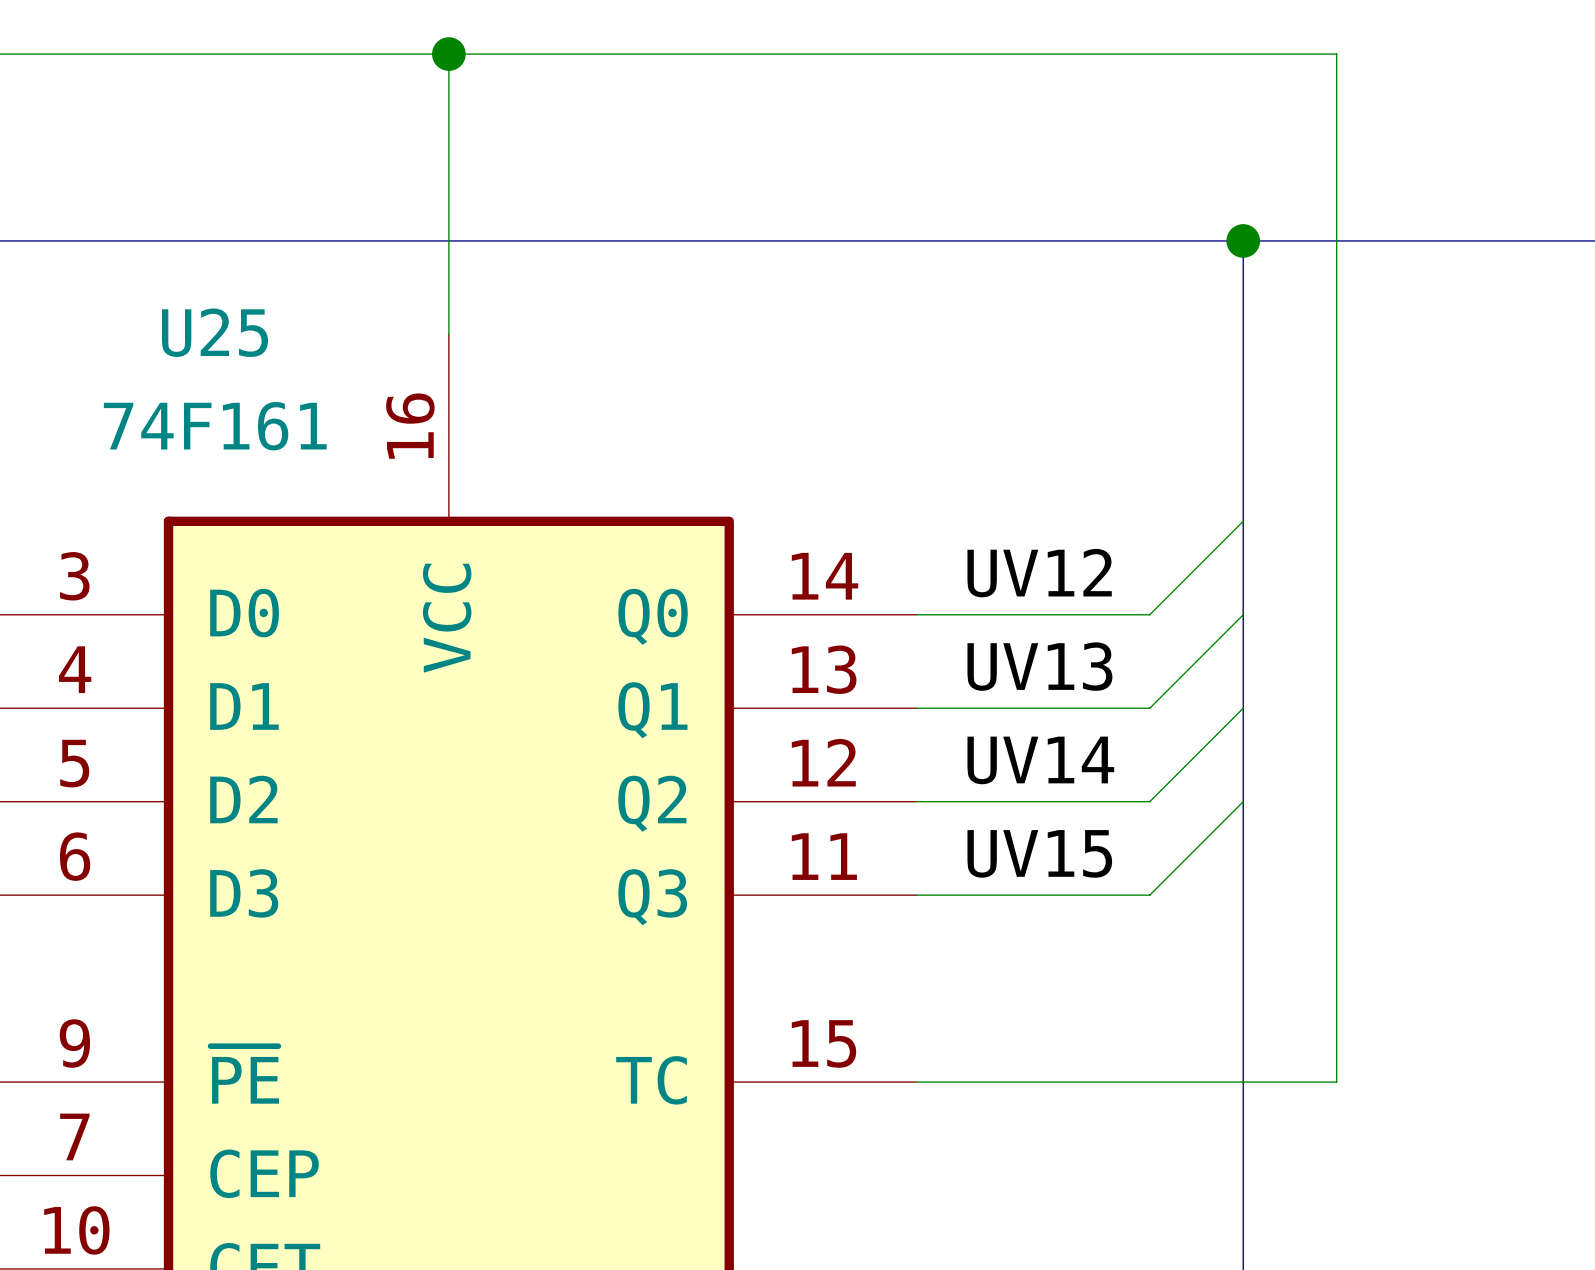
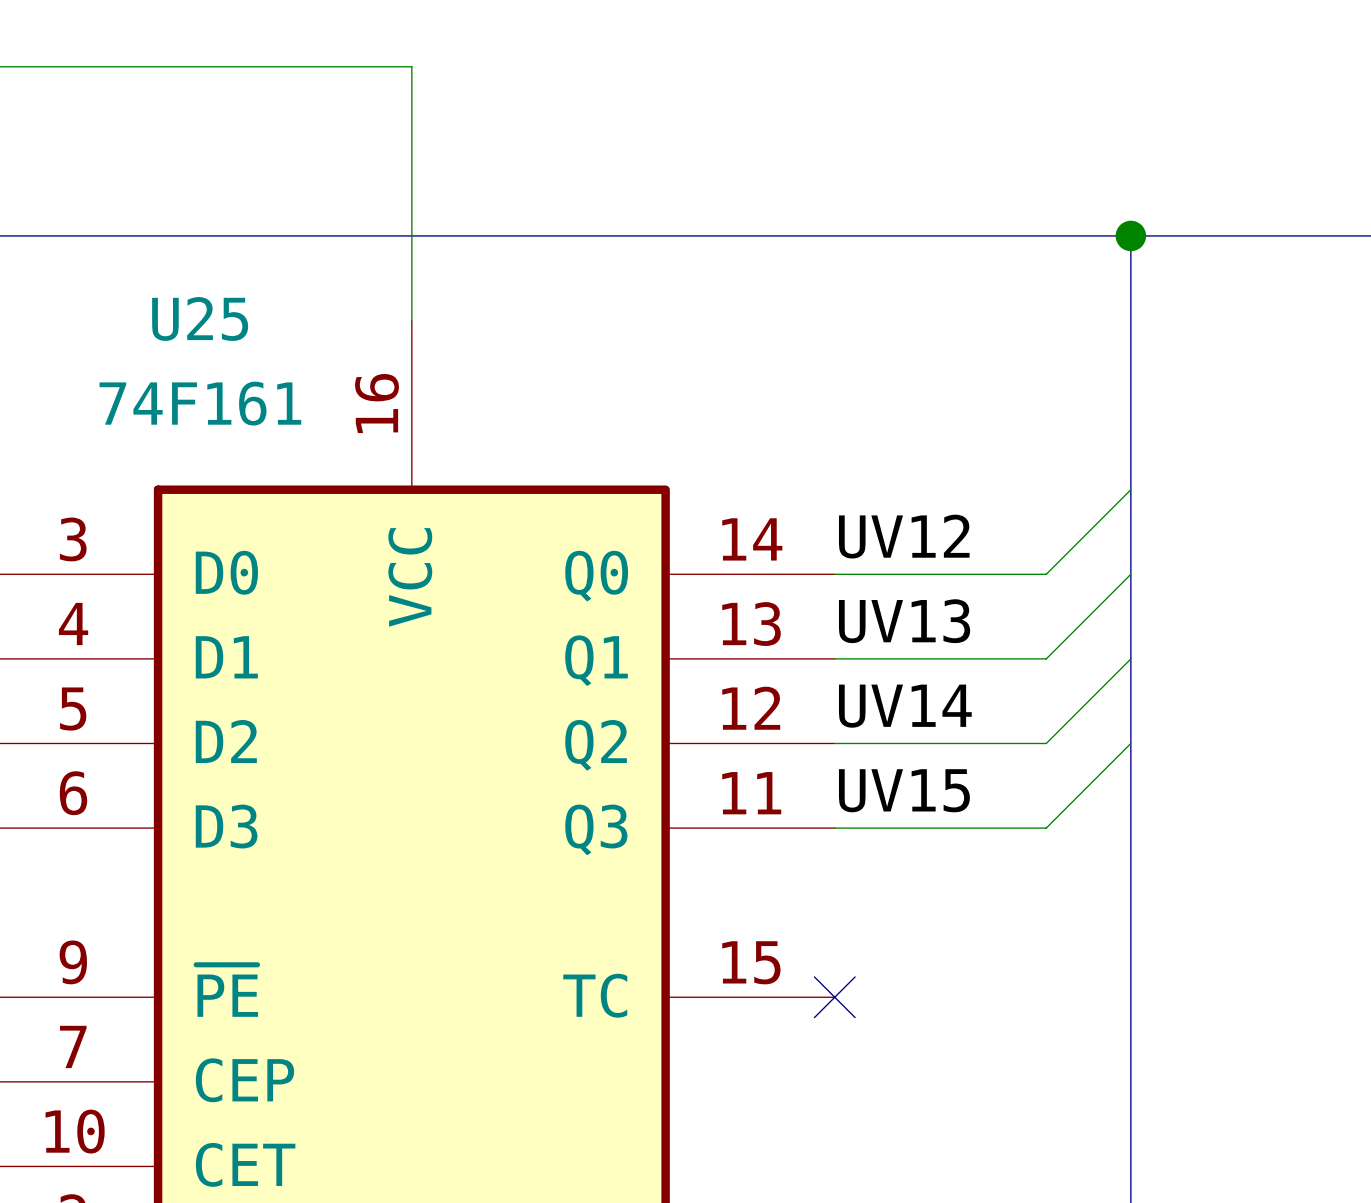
wire: (448, 54) (1336, 54) (1336, 1082) (916, 1082) -> none
junction: (448, 54) -> none
label position: UV12 (1039, 573) -> UV12 (904, 536)
label position: UV13 (1039, 666) -> UV13 (904, 621)
label position: UV14 (1040, 760) -> UV14 (905, 706)
label position: UV15 (1039, 853) -> UV15 (904, 790)
no-connect mark: none -> (834, 997)

